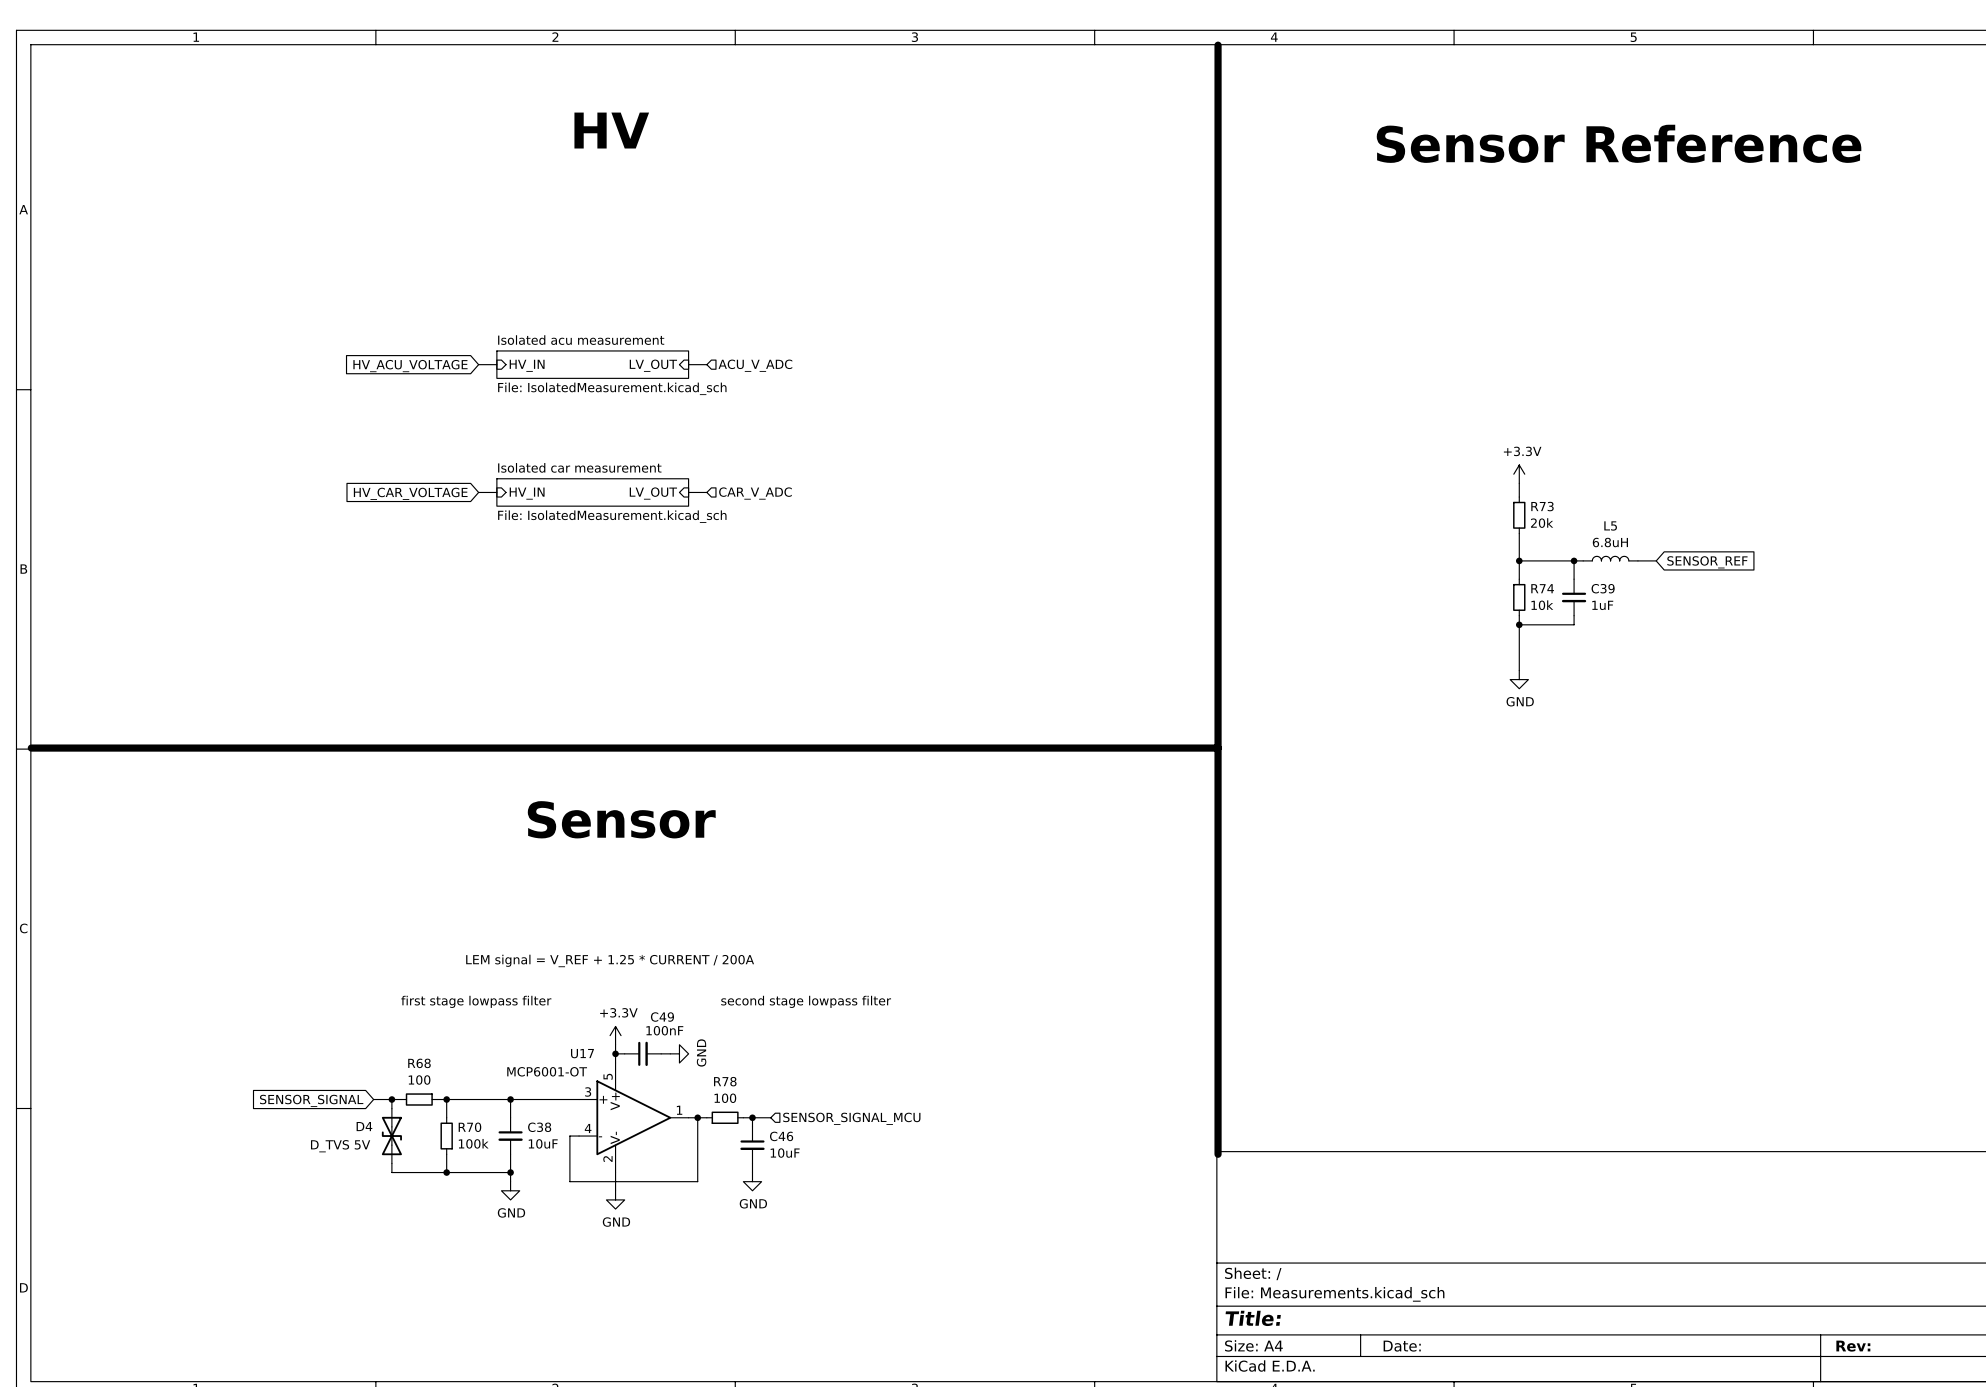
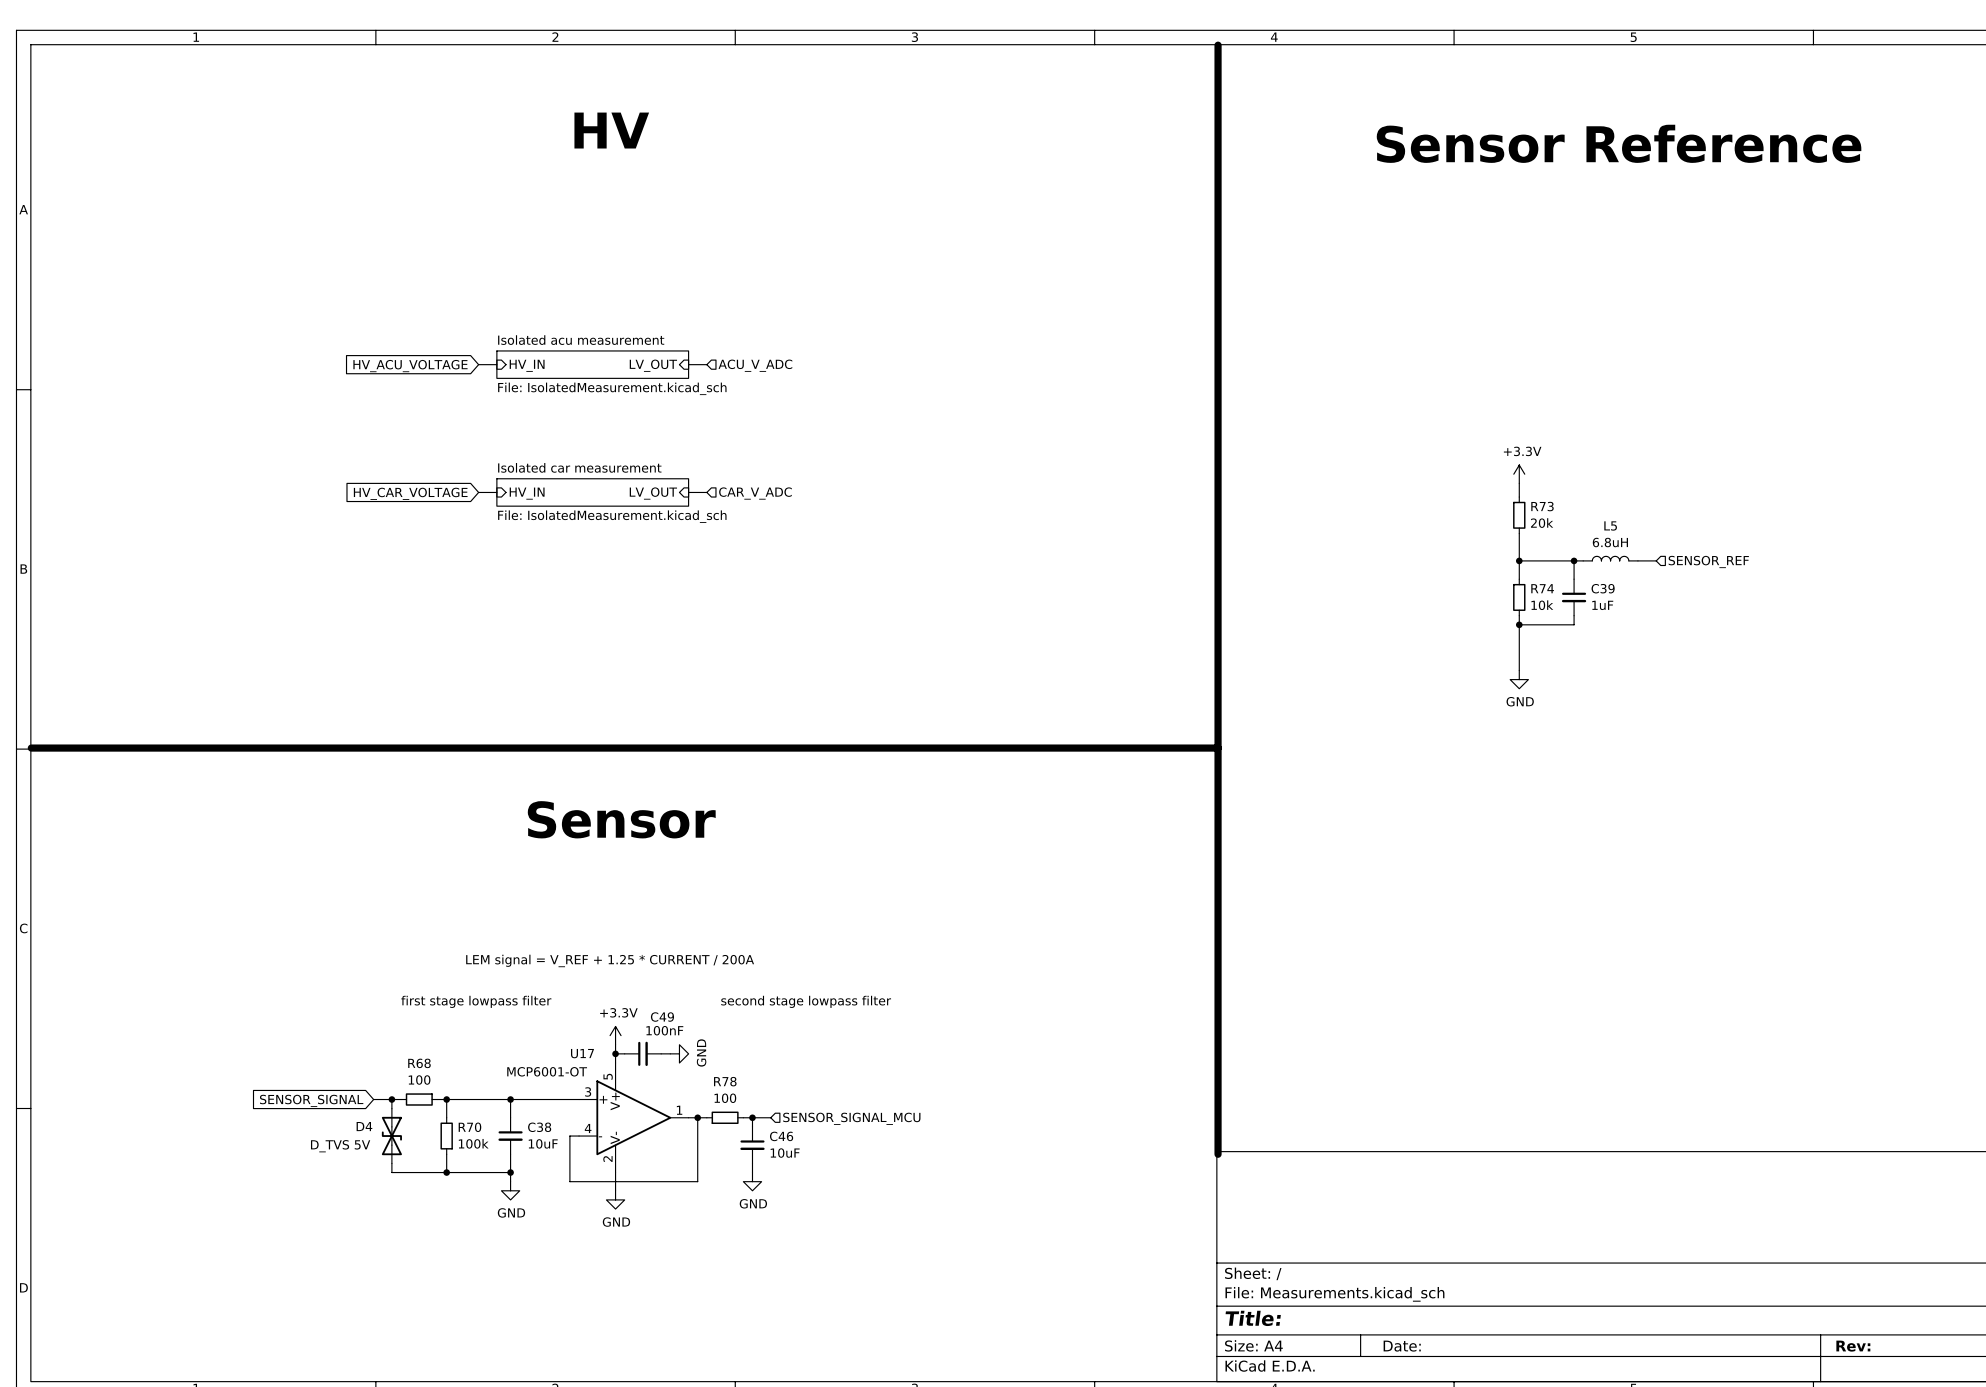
hierarchical label: none -> SENSOR_REF (1708, 561)
global label: SENSOR_REF (1707, 562) -> none

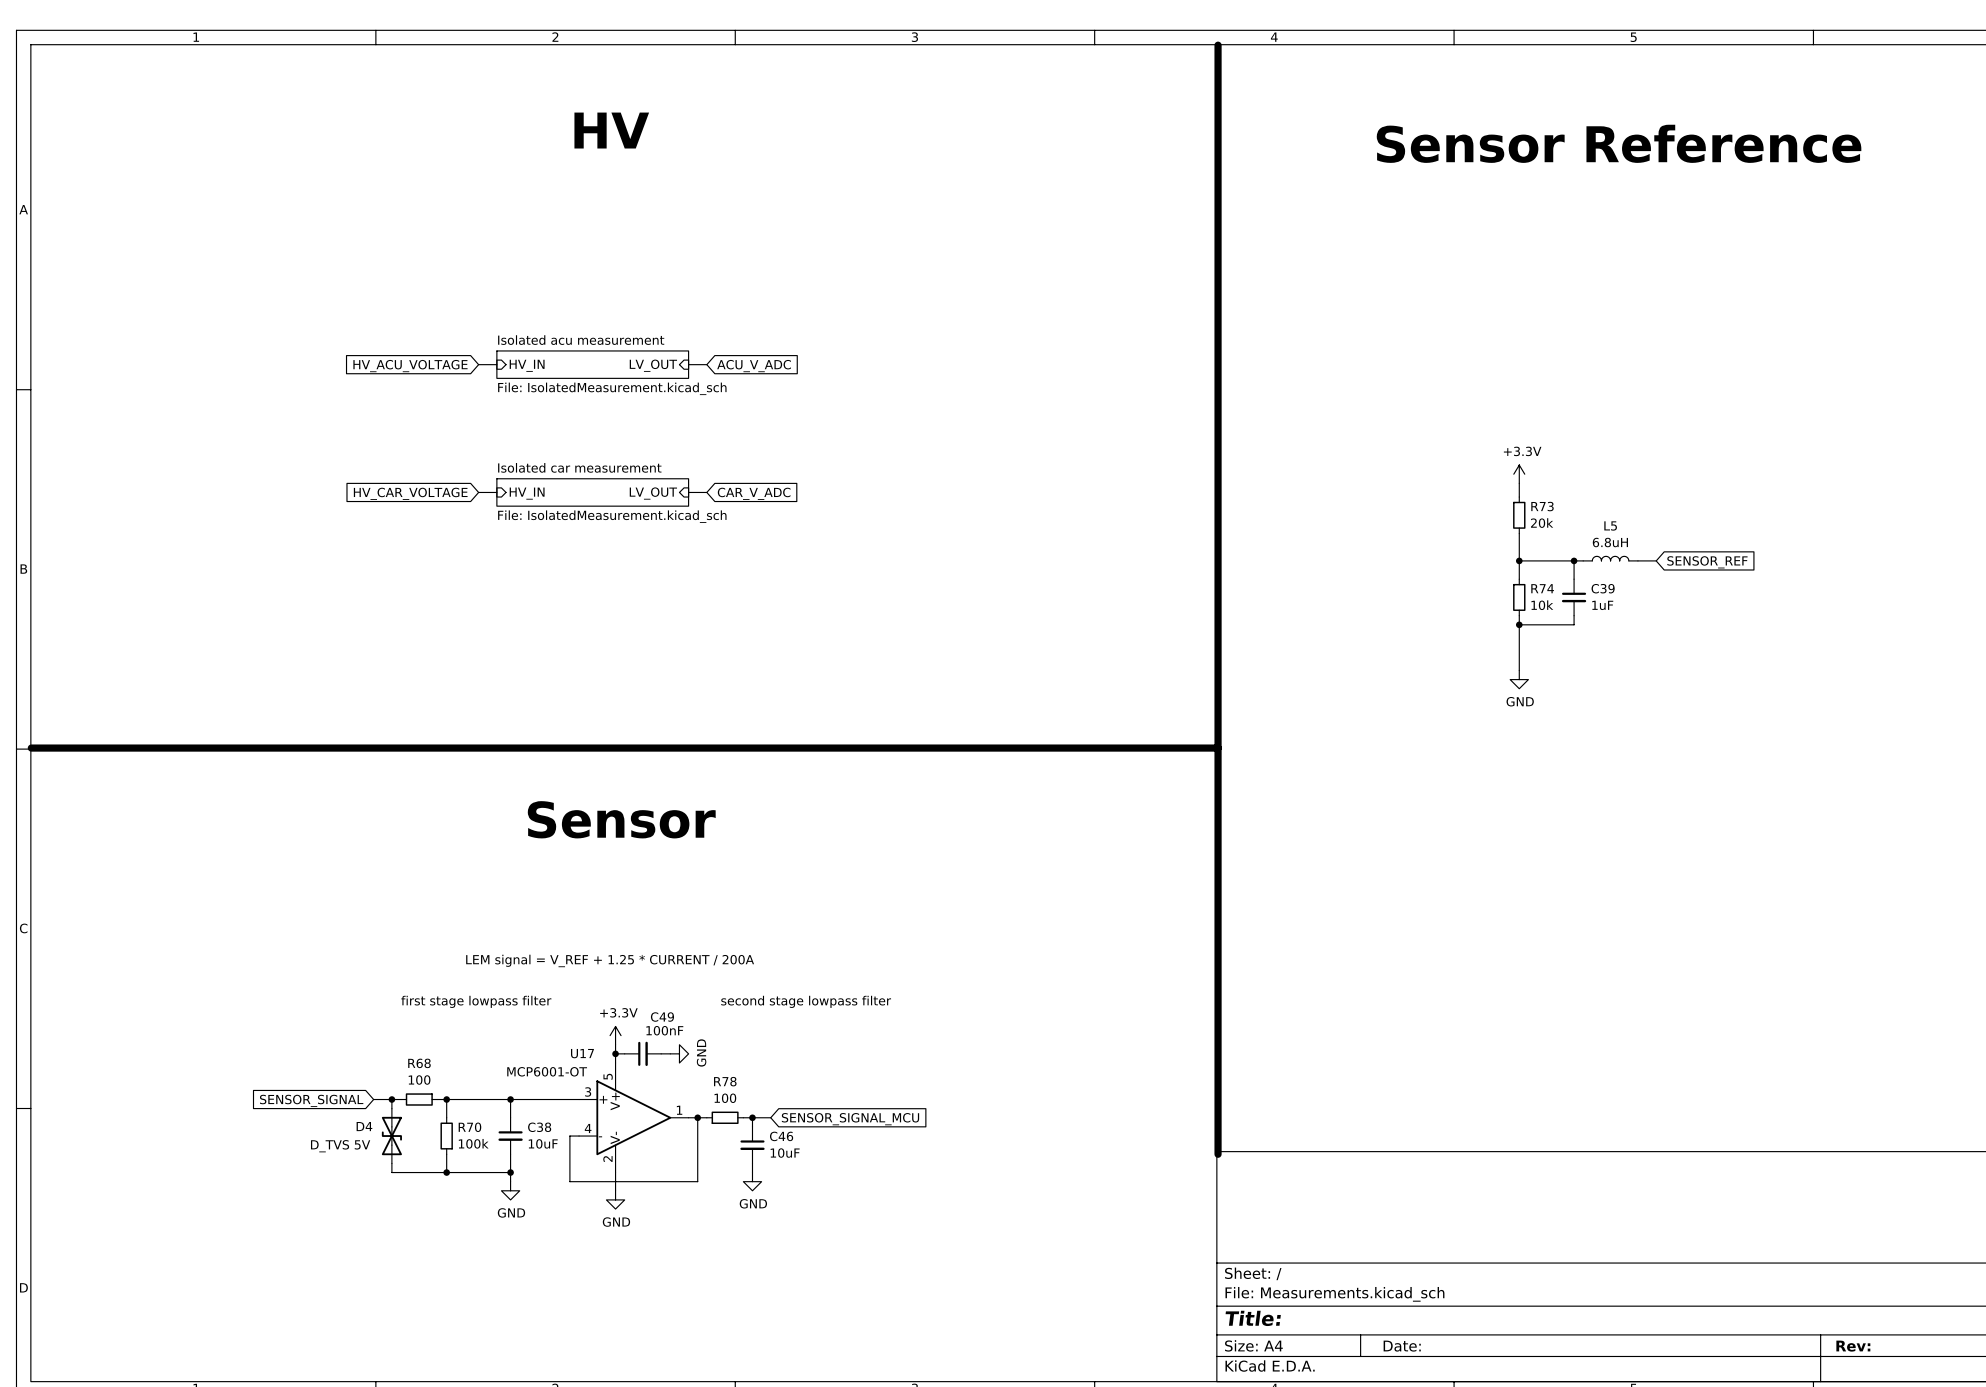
hierarchical label: ACU_V_ADC (755, 365) -> none
global label: none -> ACU_V_ADC (754, 366)
global label: none -> CAR_V_ADC (754, 493)
hierarchical label: CAR_V_ADC (755, 493) -> none
hierarchical label: SENSOR_REF (1708, 561) -> none
global label: none -> SENSOR_REF (1707, 562)
hierarchical label: SENSOR_SIGNAL_MCU (851, 1118) -> none
global label: none -> SENSOR_SIGNAL_MCU (850, 1119)

